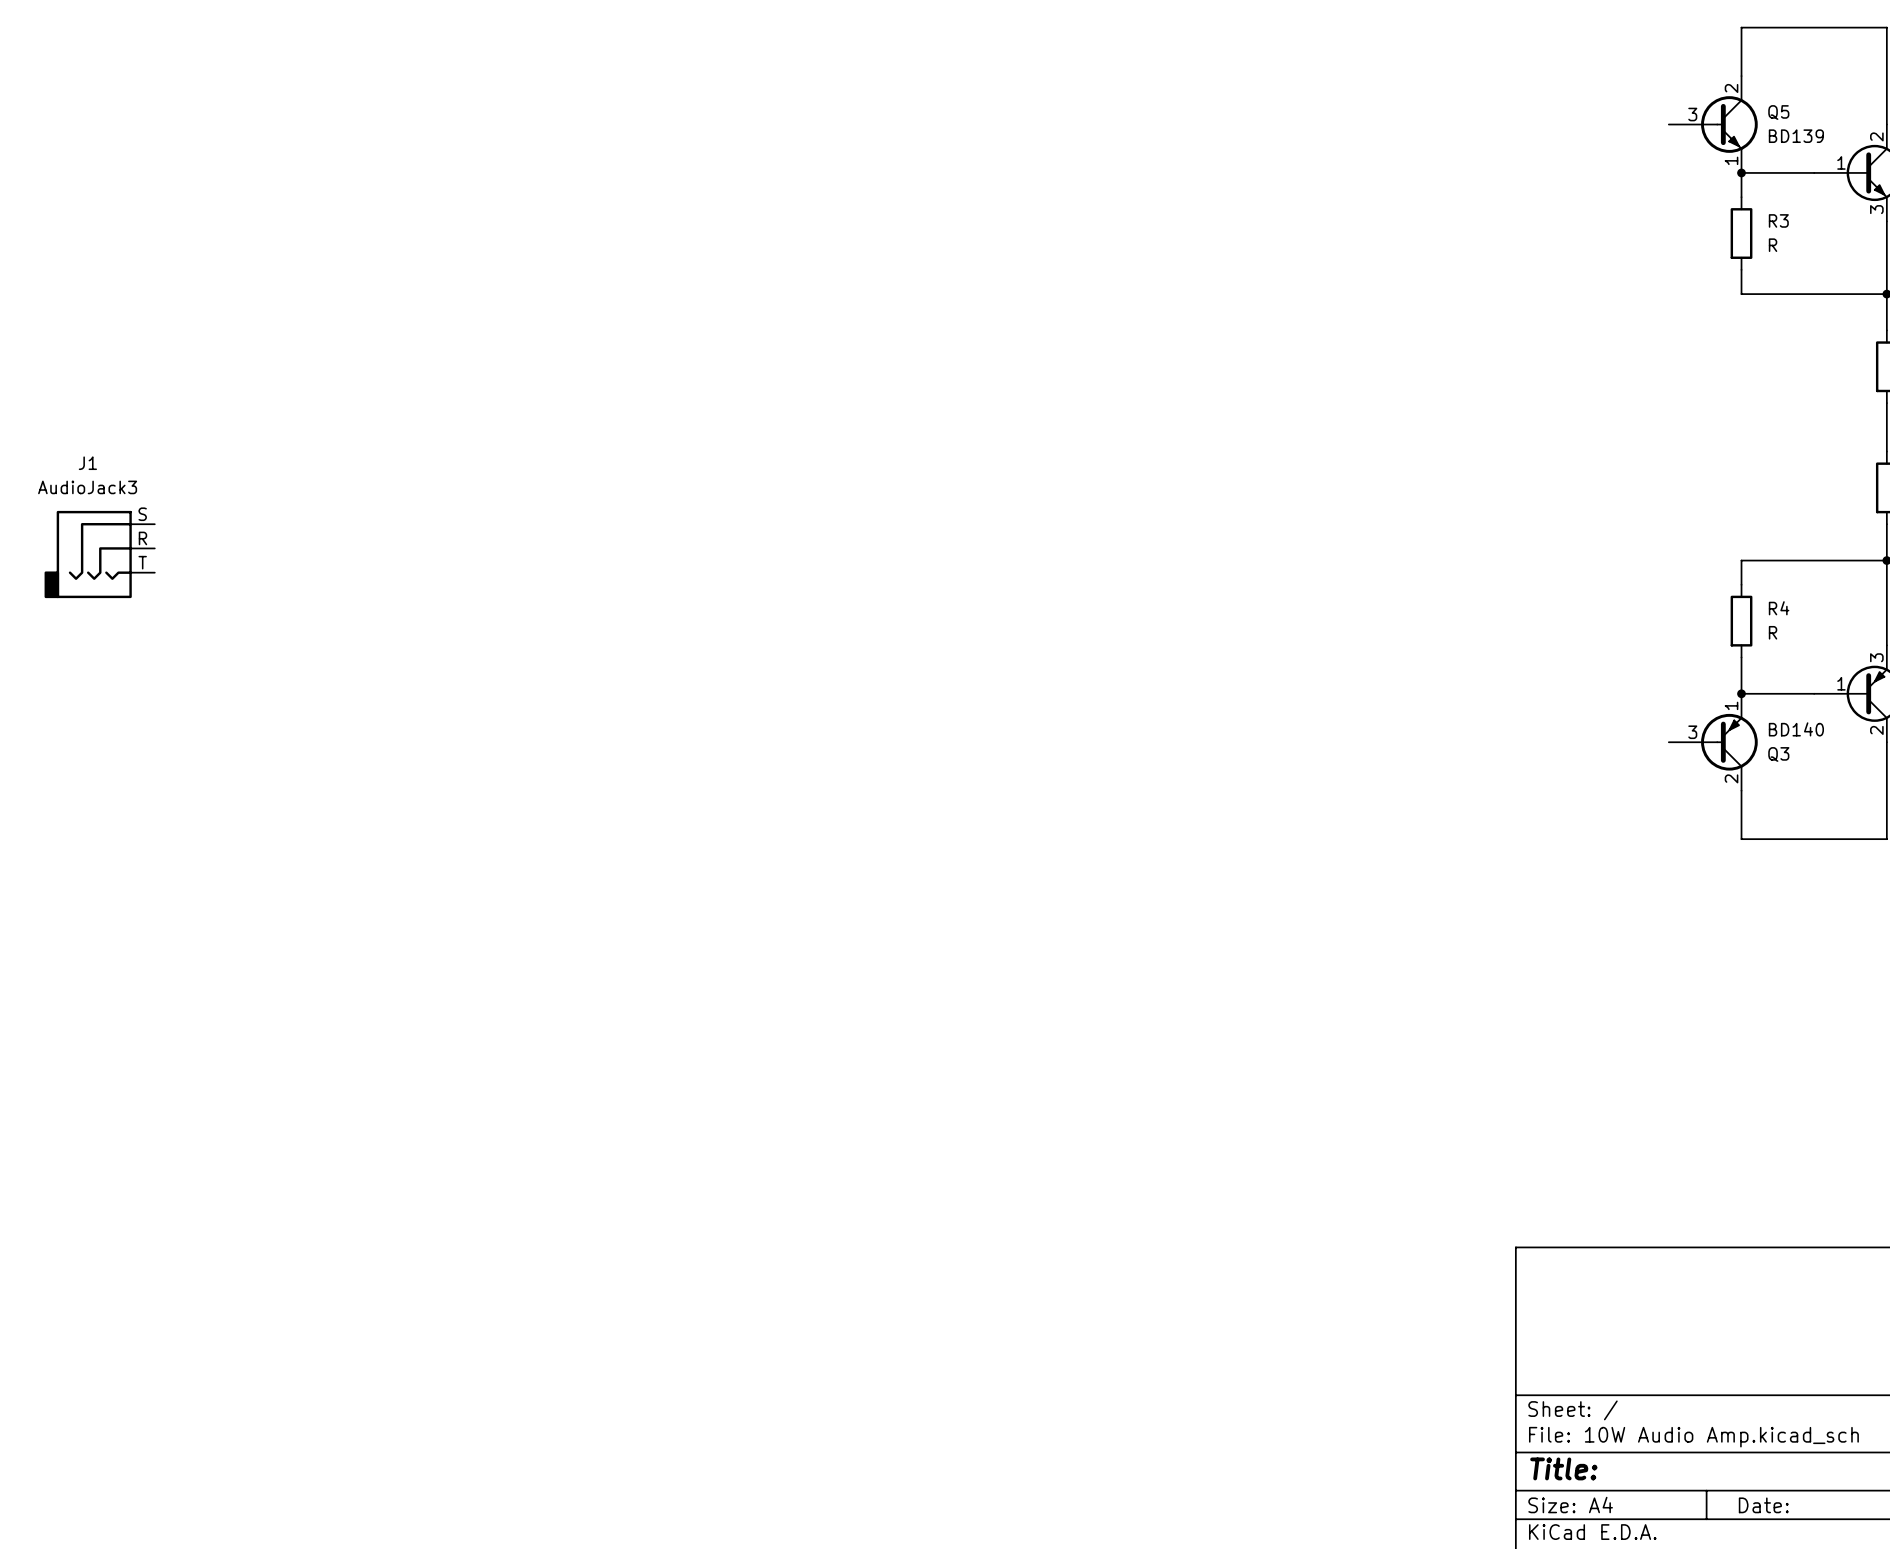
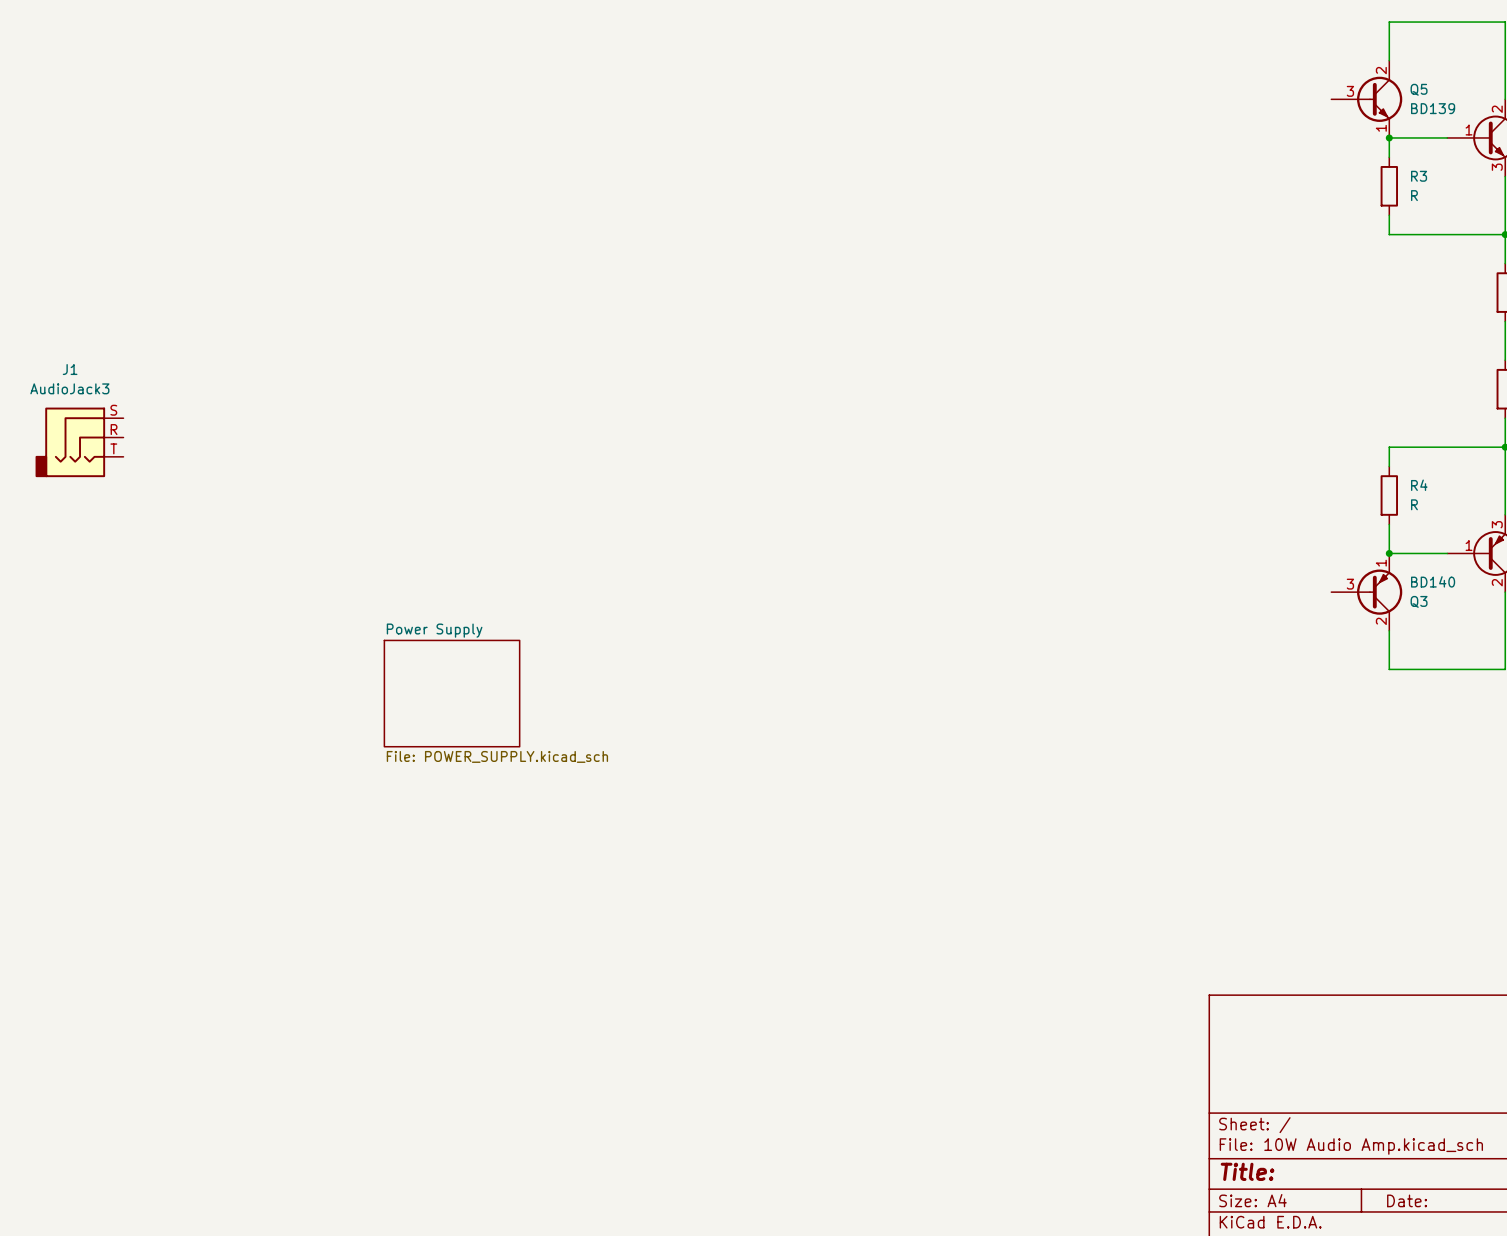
sheet Power Supply: none -> File: POWER_SUPPLY.kicad_sch (452, 693)

